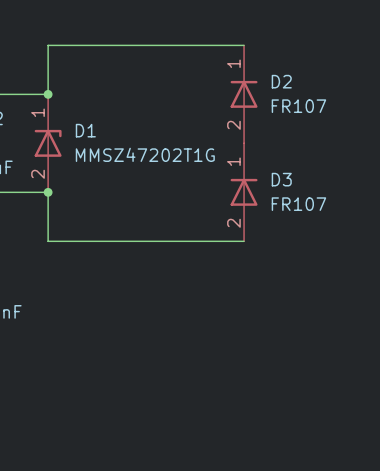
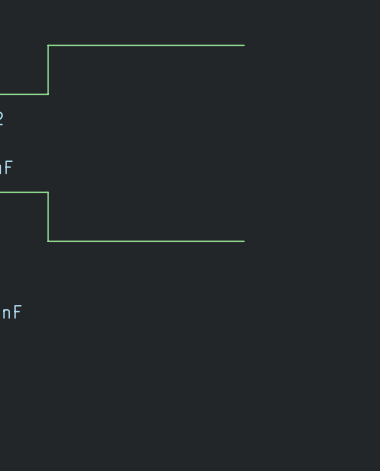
junction: (48, 94) -> none
D2: FR107 (244, 94) -> none
D1: MMSZ47202T1G (48, 143) -> none
junction: (48, 192) -> none
D3: FR107 (244, 192) -> none

